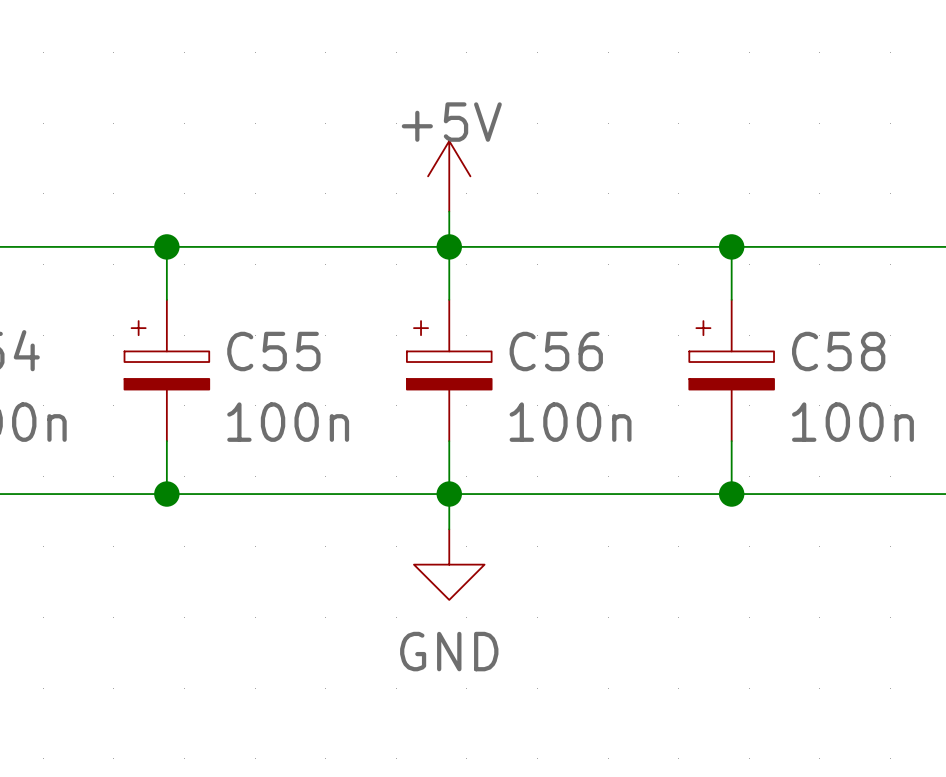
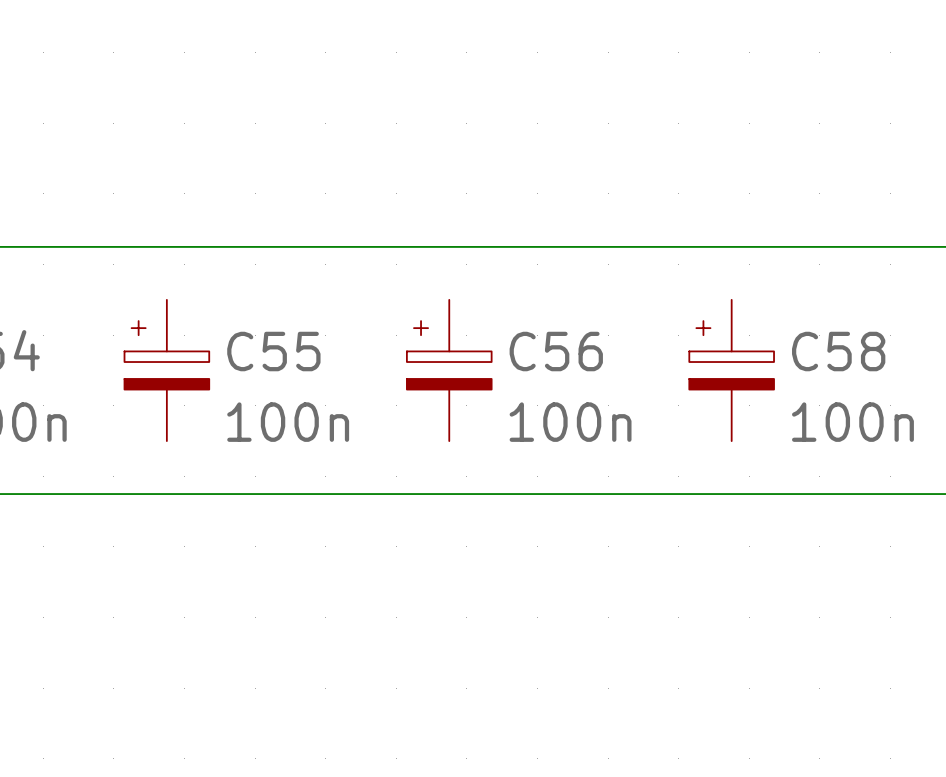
power symbol: +5V (449, 176) -> none
wire: (449, 211) (449, 299) -> none
wire: (166, 246) (166, 299) -> none
junction: (166, 246) -> none
junction: (449, 246) -> none
wire: (731, 246) (731, 299) -> none
junction: (731, 246) -> none
wire: (166, 441) (166, 494) -> none
wire: (449, 441) (449, 529) -> none
wire: (731, 441) (731, 494) -> none
junction: (166, 494) -> none
junction: (449, 494) -> none
junction: (731, 494) -> none
power symbol: GND (449, 564) -> none

